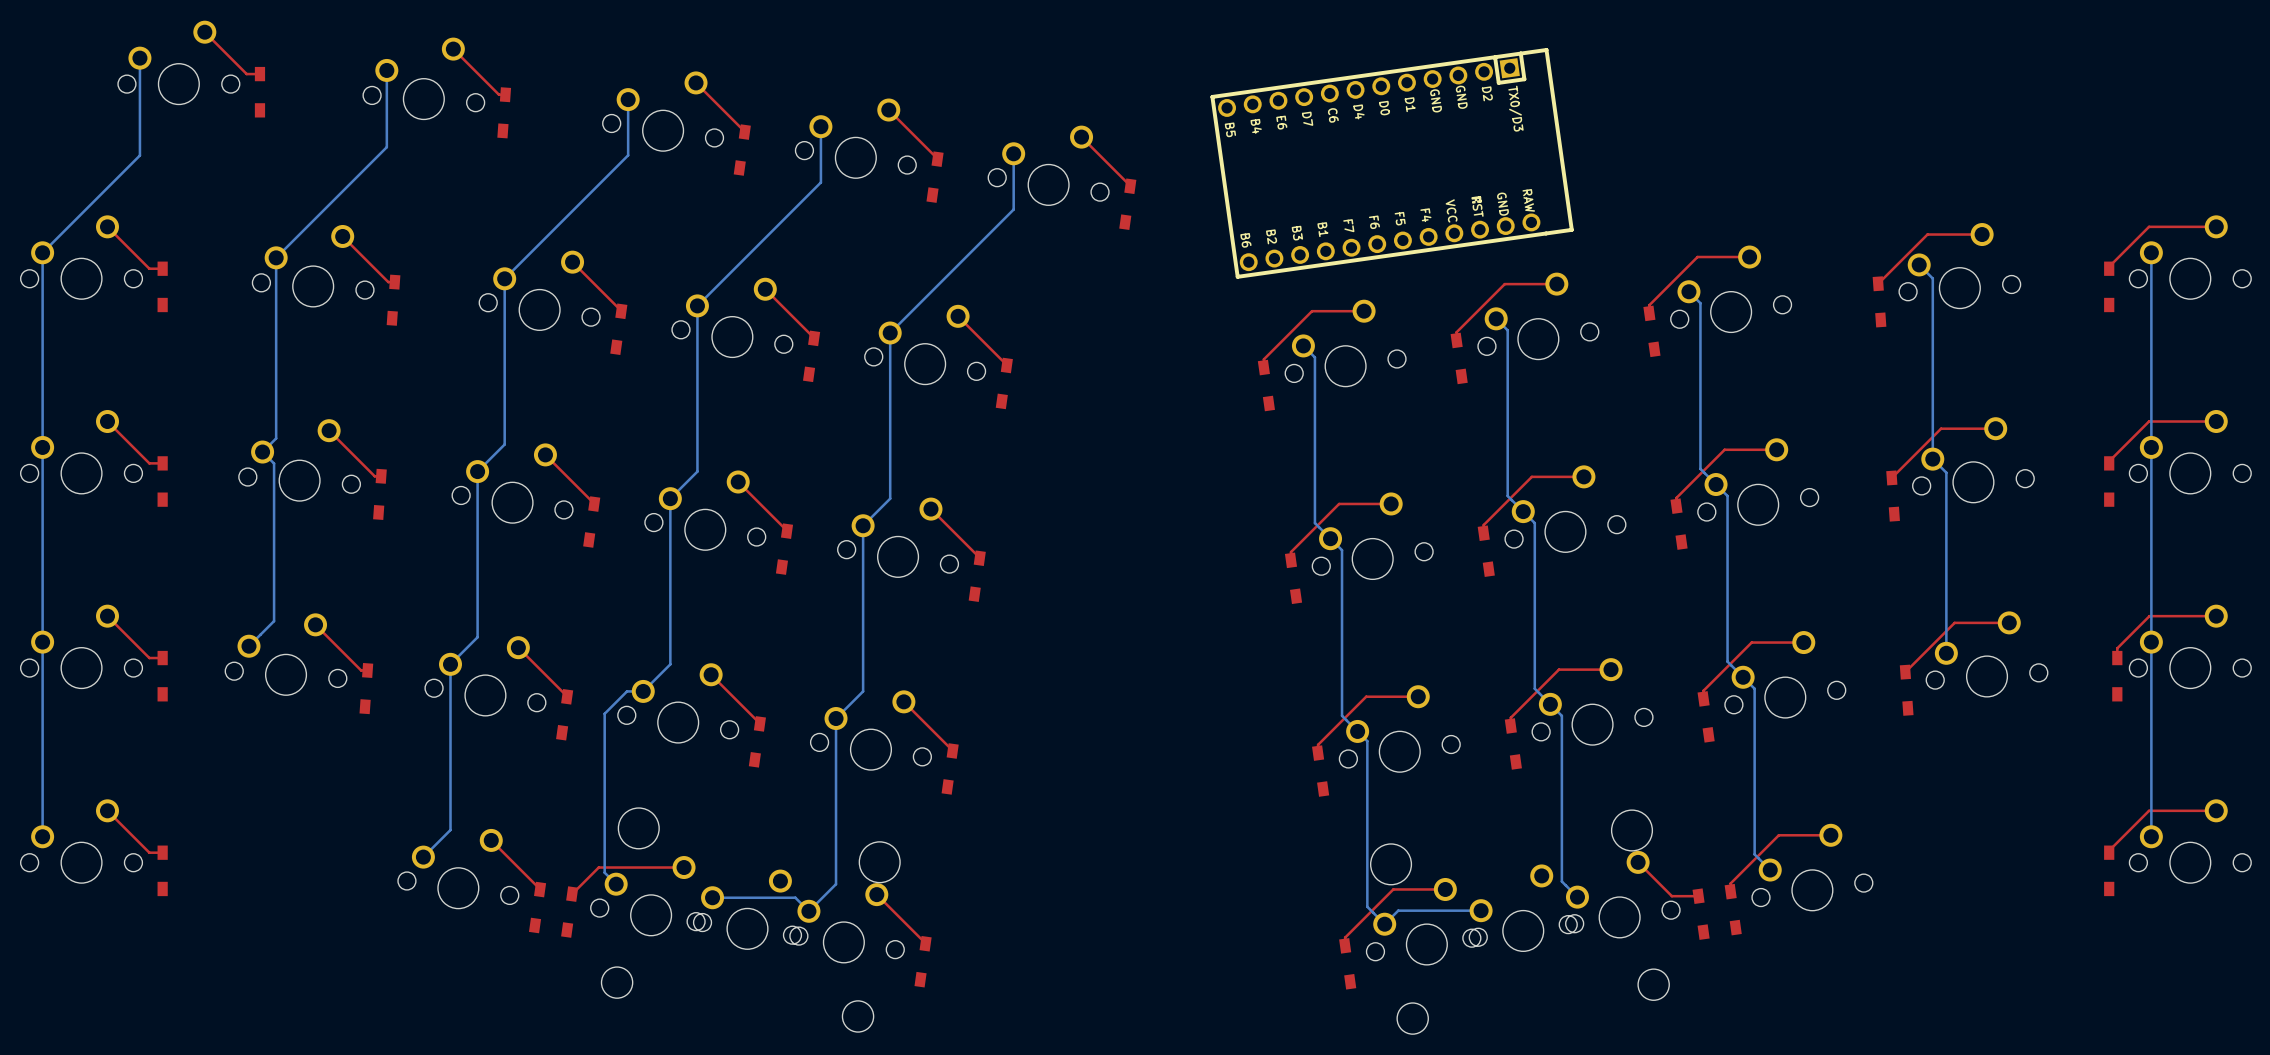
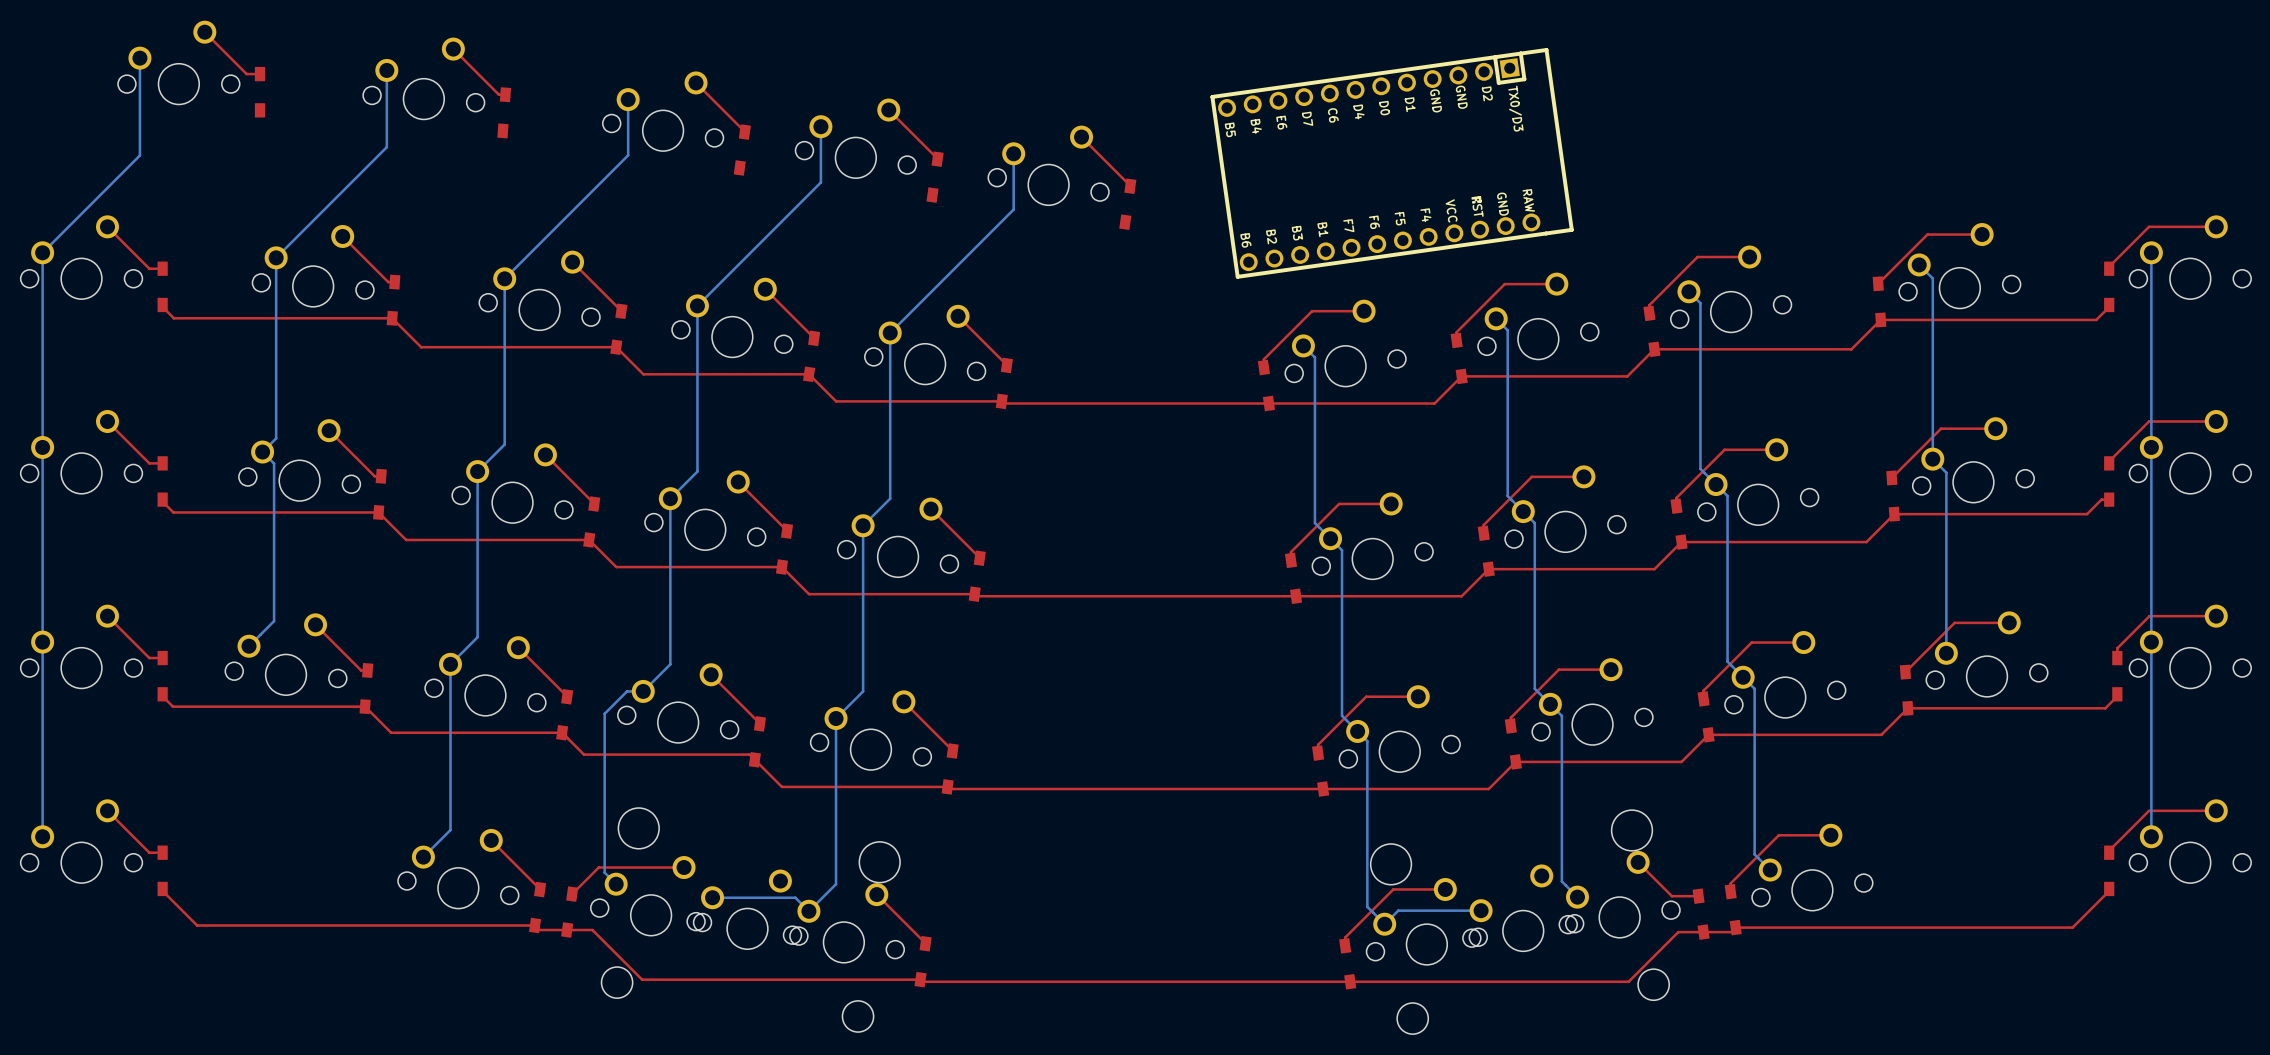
top track: none -> (2109, 305) (2096, 319) (1880, 319) (1851, 349) (1654, 349) (1627, 376) (1461, 376) (1434, 403) (1003, 403) (1001, 401) (836, 401) (809, 374) (643, 374) (616, 347) (421, 347) (392, 318) (173, 318) (162, 305)
top track: none -> (2109, 499) (2101, 499) (2087, 514) (1894, 514) (1866, 542) (1681, 542) (1654, 569) (1488, 569) (1461, 596) (976, 596) (974, 594) (809, 594) (781, 567) (616, 567) (589, 539) (406, 539) (378, 512) (173, 512) (162, 499)
top track: none -> (2117, 694) (2105, 708) (1907, 708) (1881, 734) (1708, 734) (1681, 761) (1515, 761) (1488, 789) (949, 789) (947, 786) (781, 786) (749, 754) (583, 754) (562, 732) (391, 732) (365, 706) (172, 706) (162, 694)
top track: none -> (2109, 888) (2072, 927) (1735, 927) (1731, 932) (1678, 932) (1628, 981) (642, 979) (592, 930) (539, 930) (535, 925) (197, 925) (162, 888)

